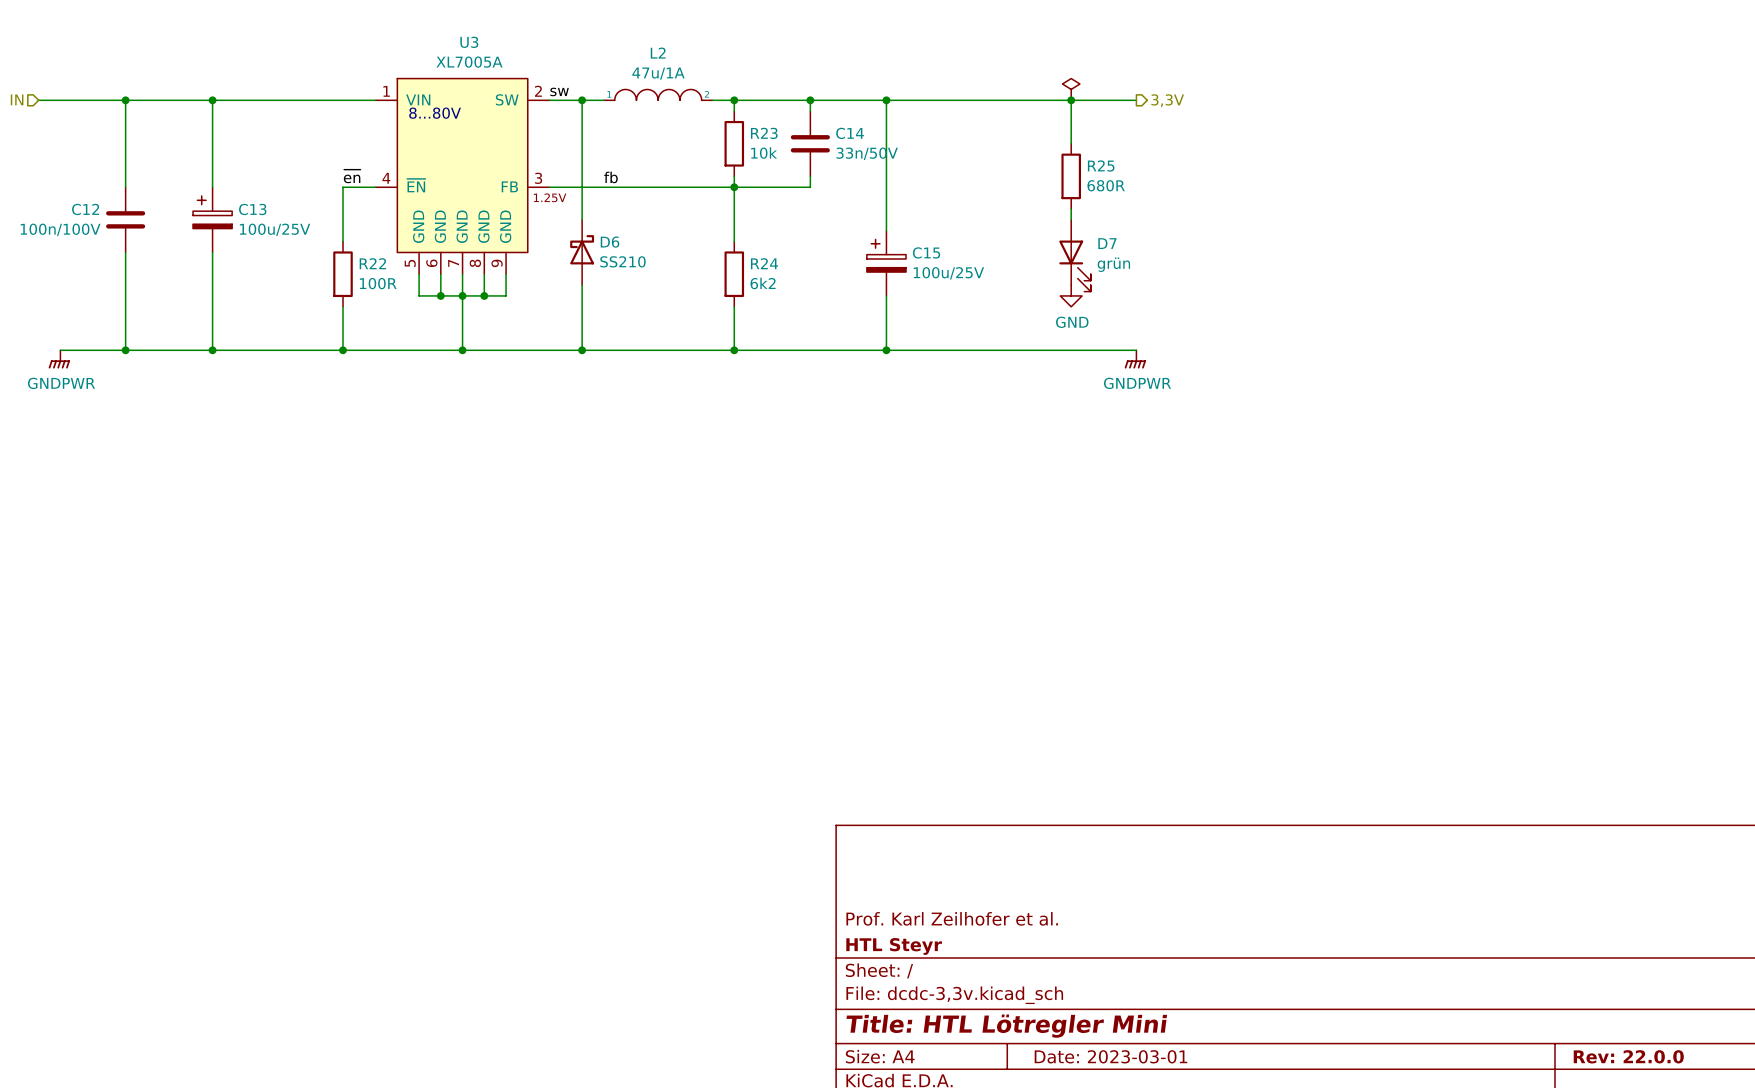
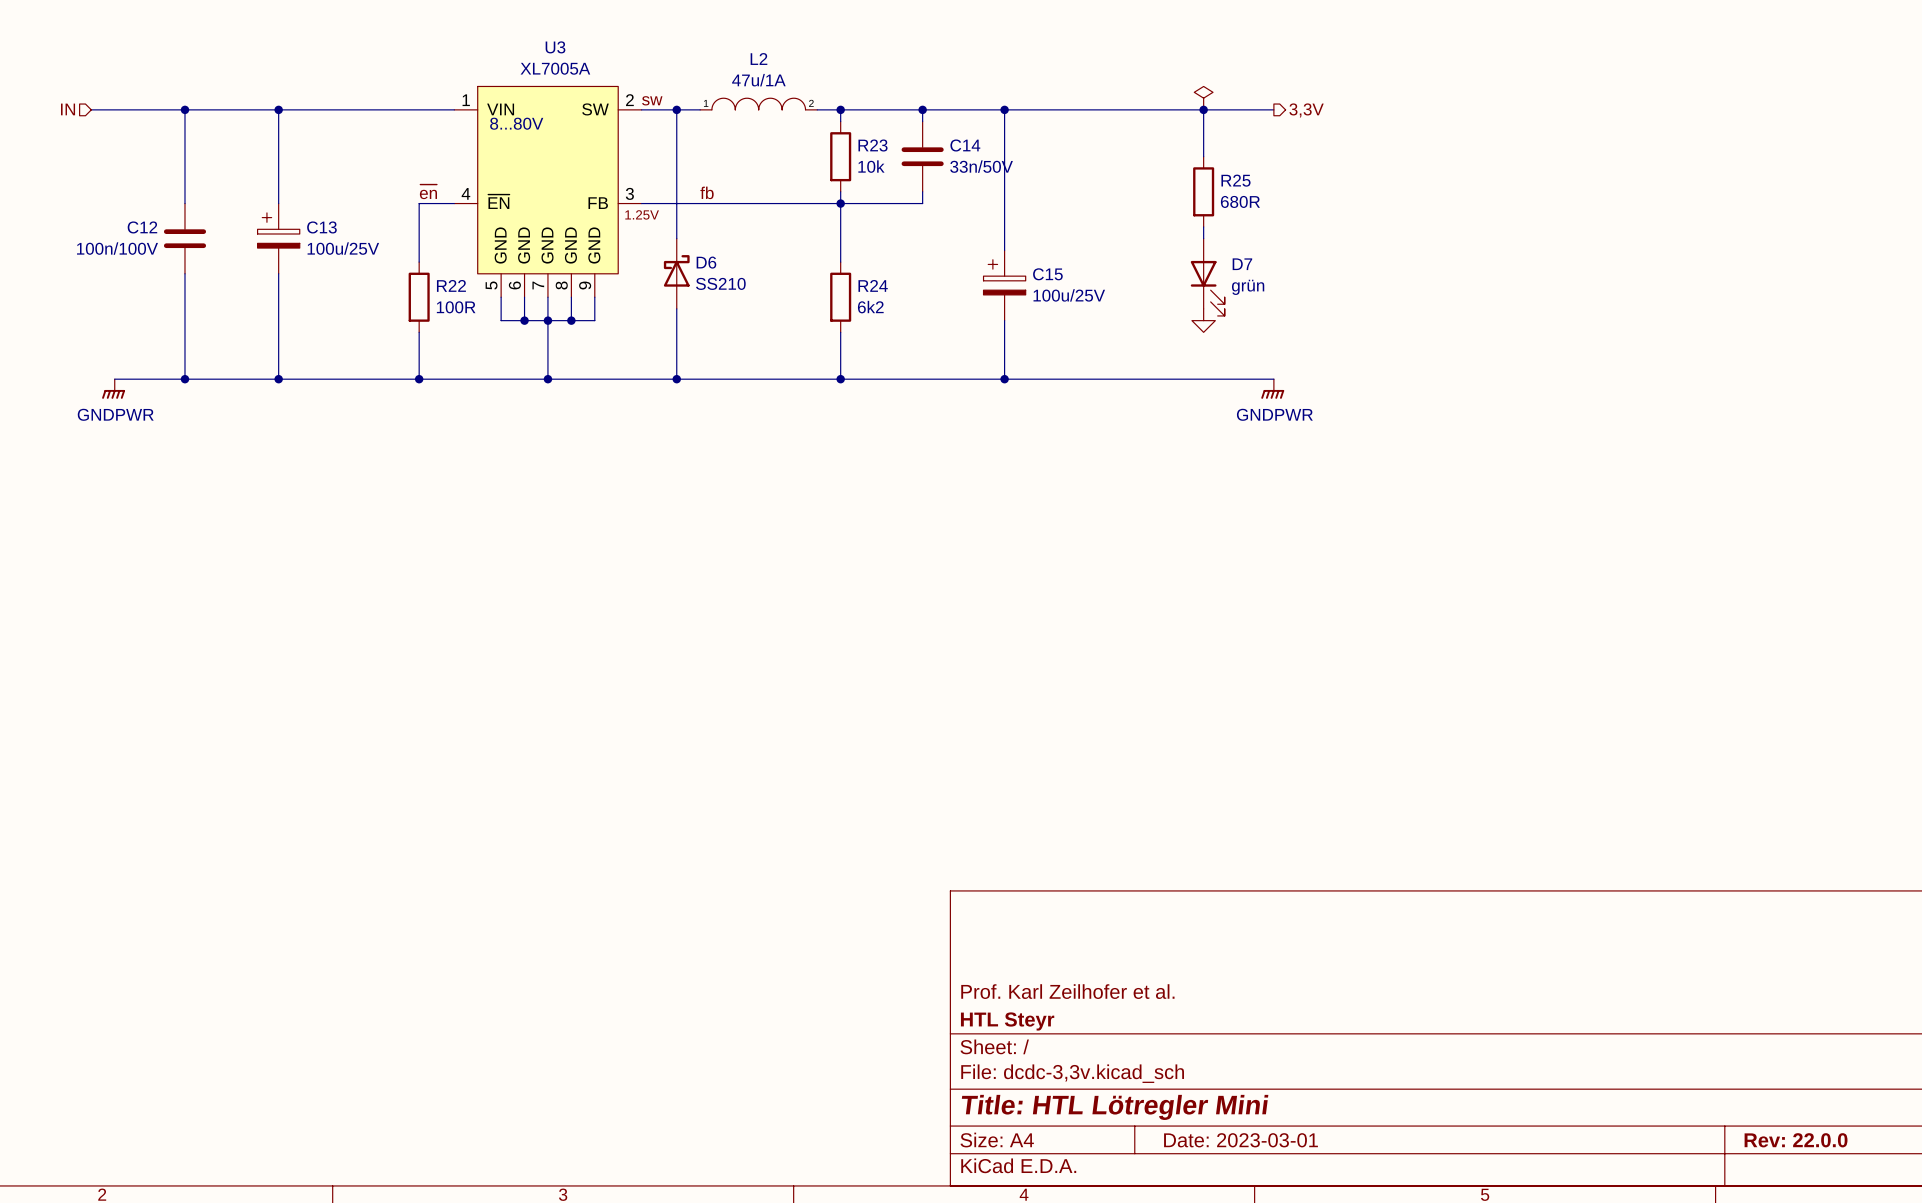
power symbol text: GND (1072, 322) -> none

